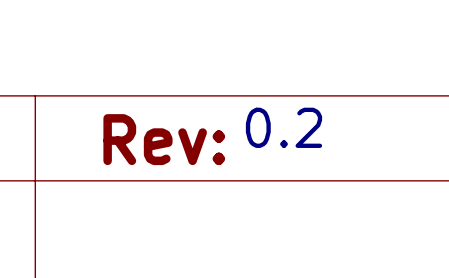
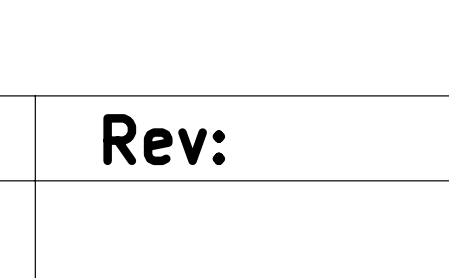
text: 0.2 (284, 127) -> none

